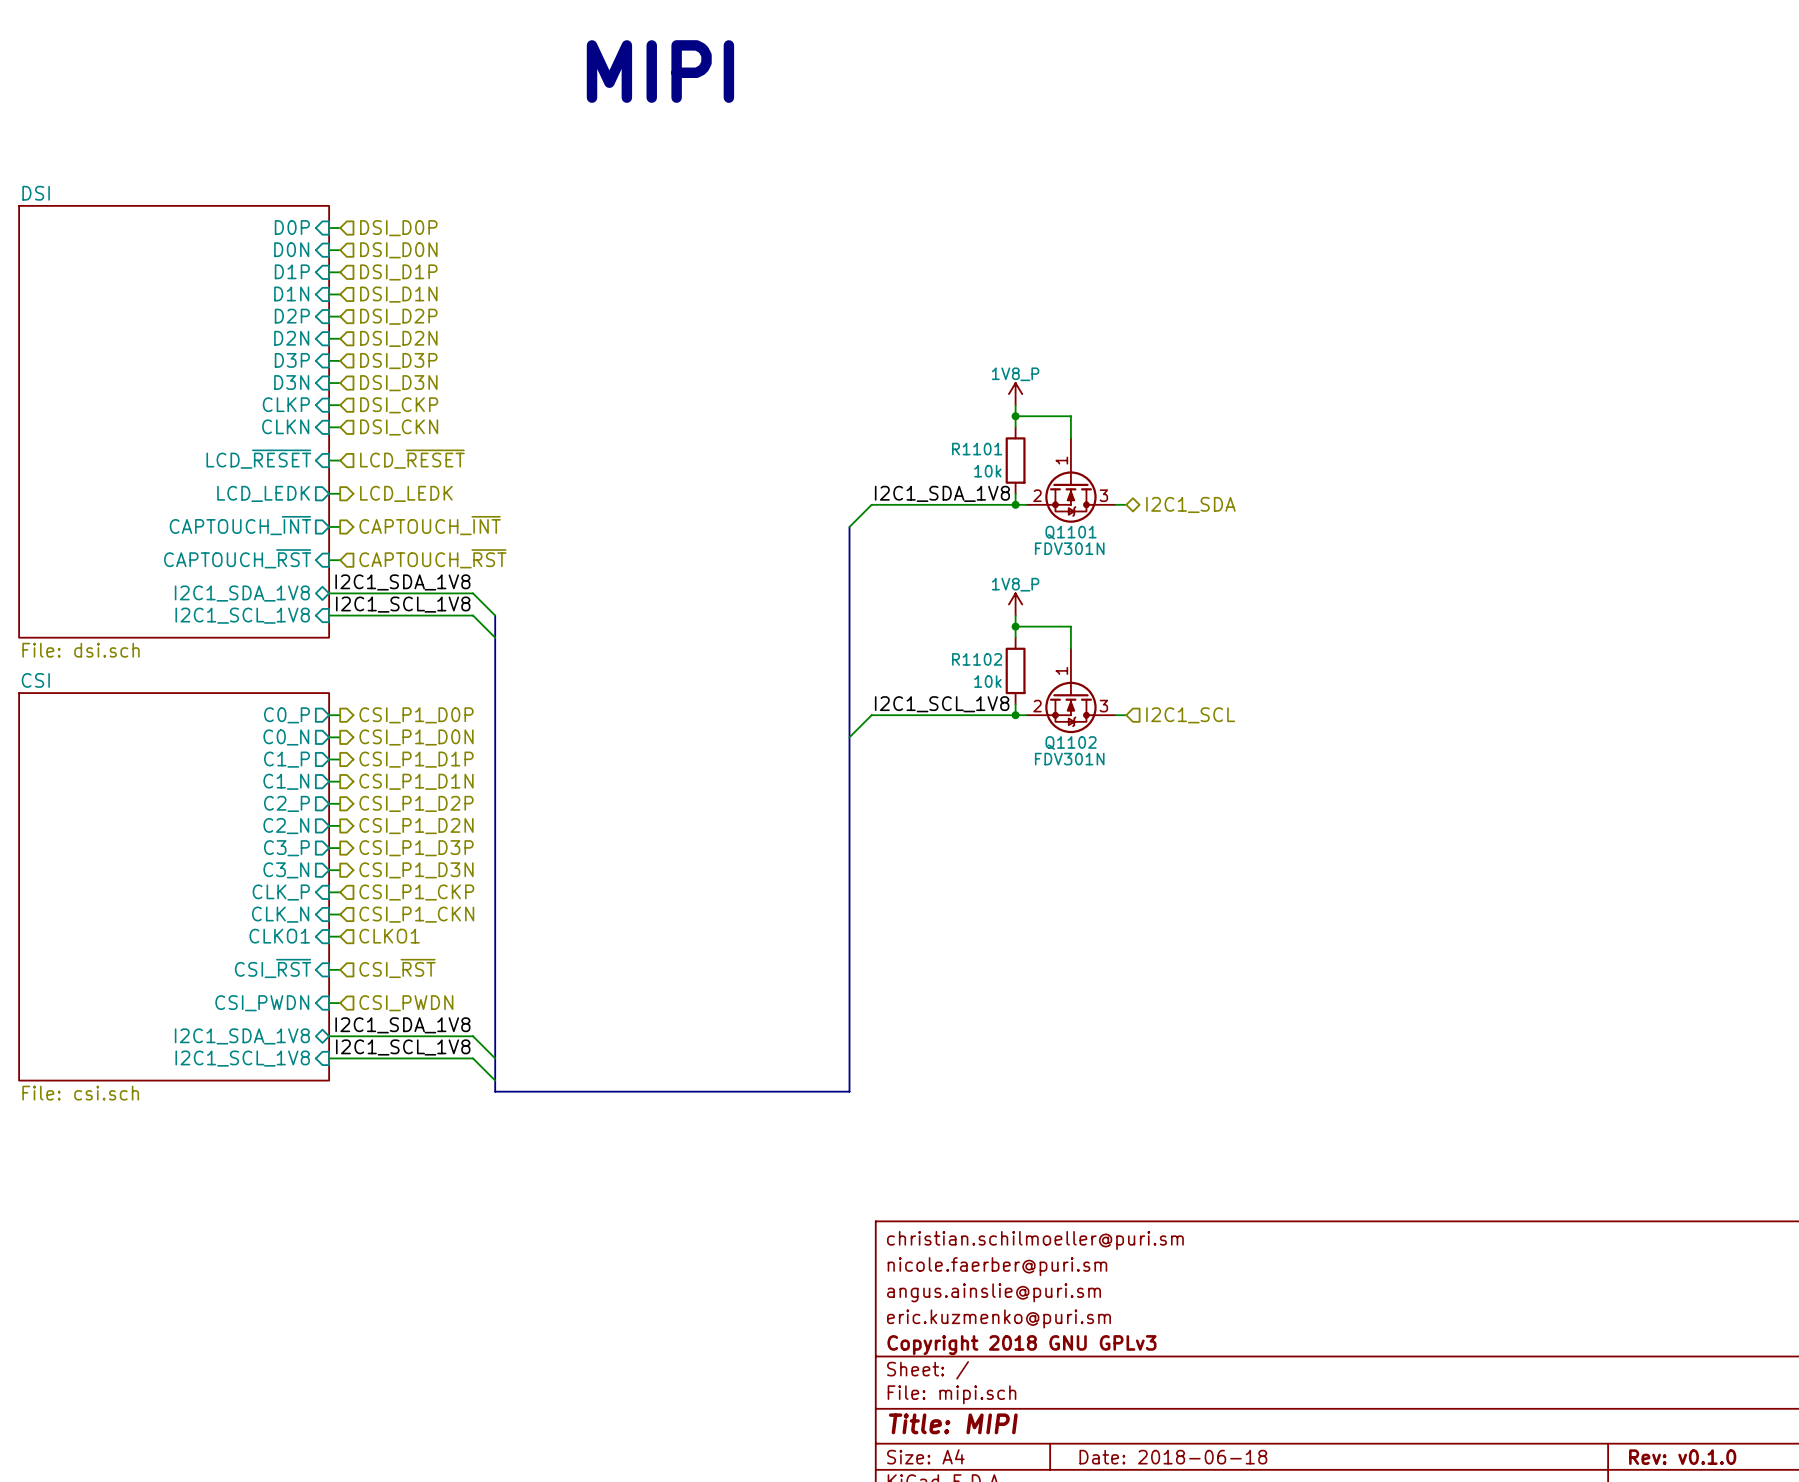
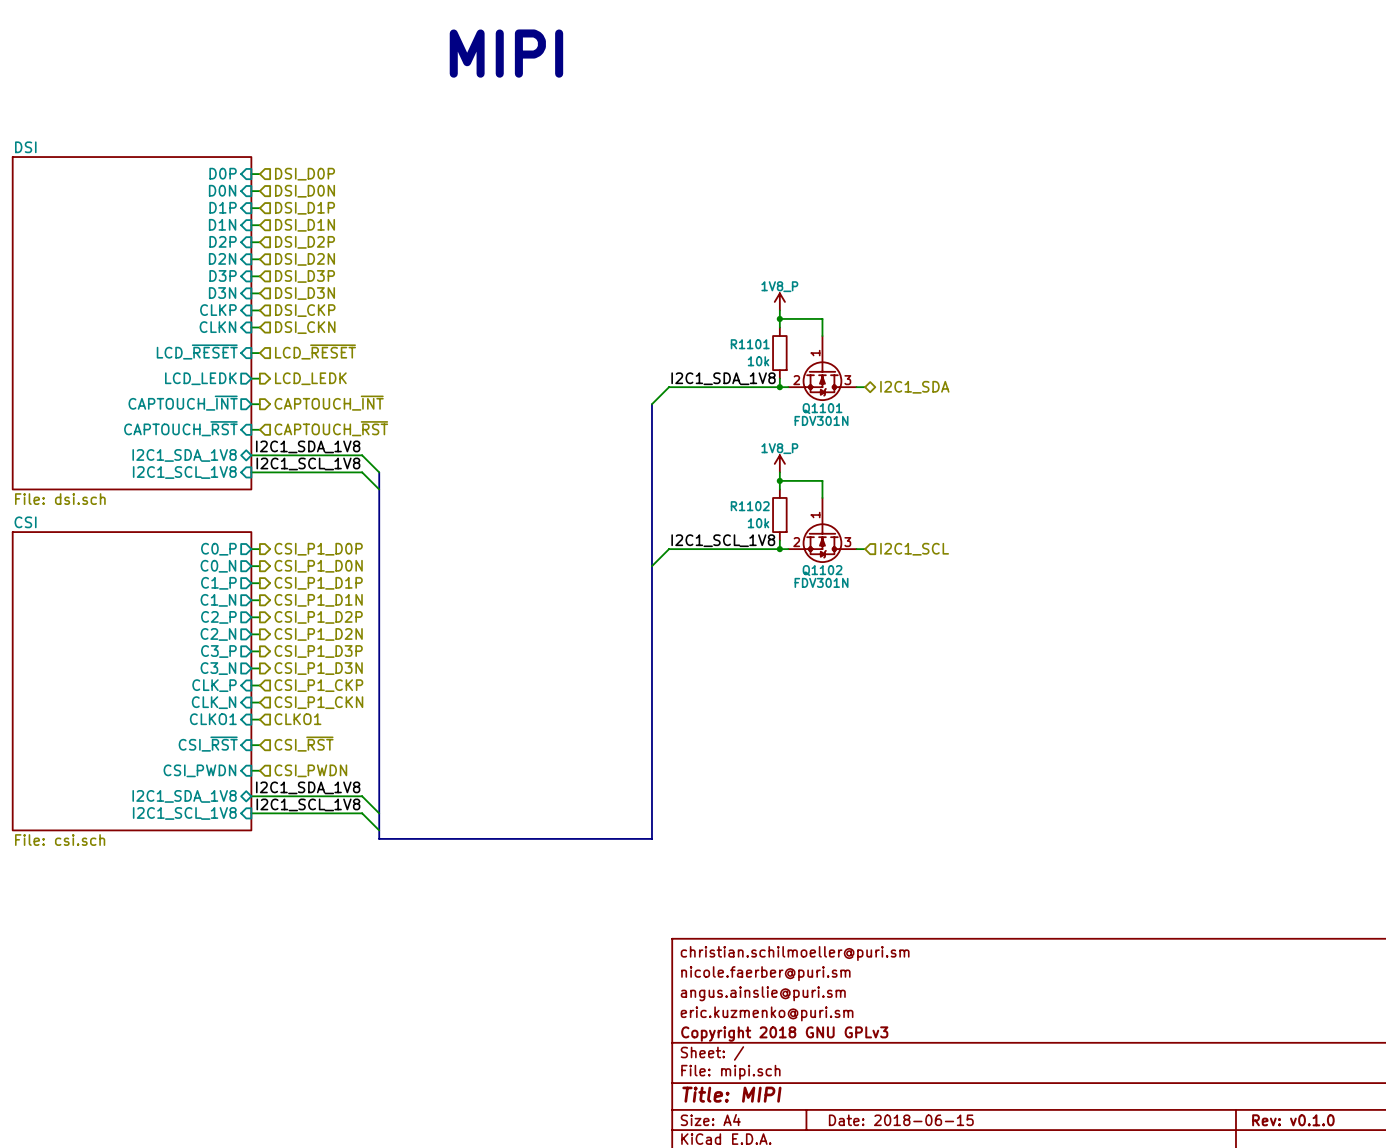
title block: Date: 2018-06-18 (1173, 1457) -> Date: 2018-06-15 (901, 1120)

